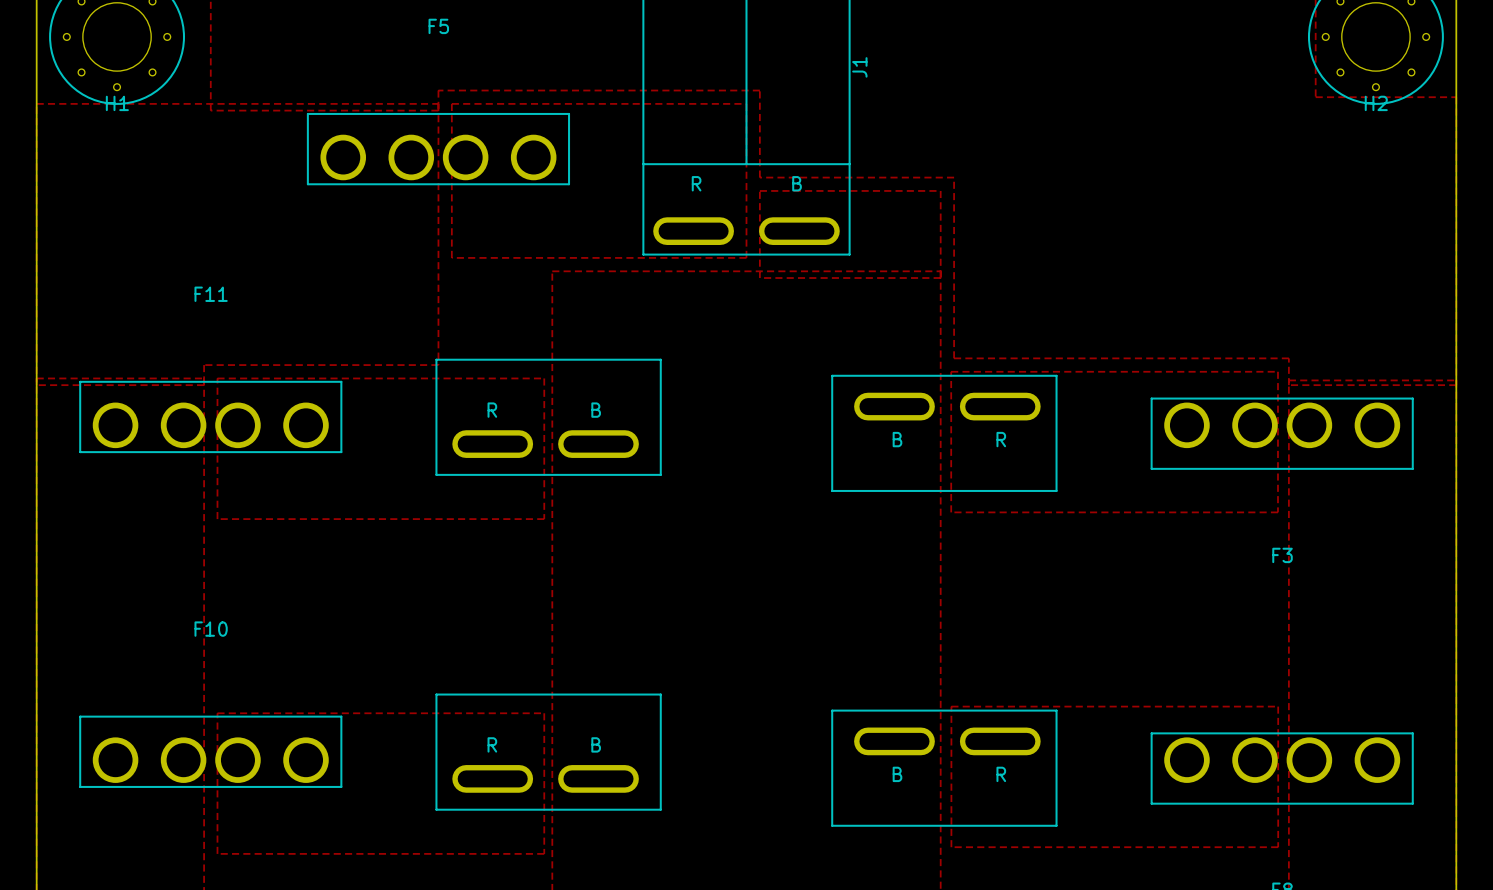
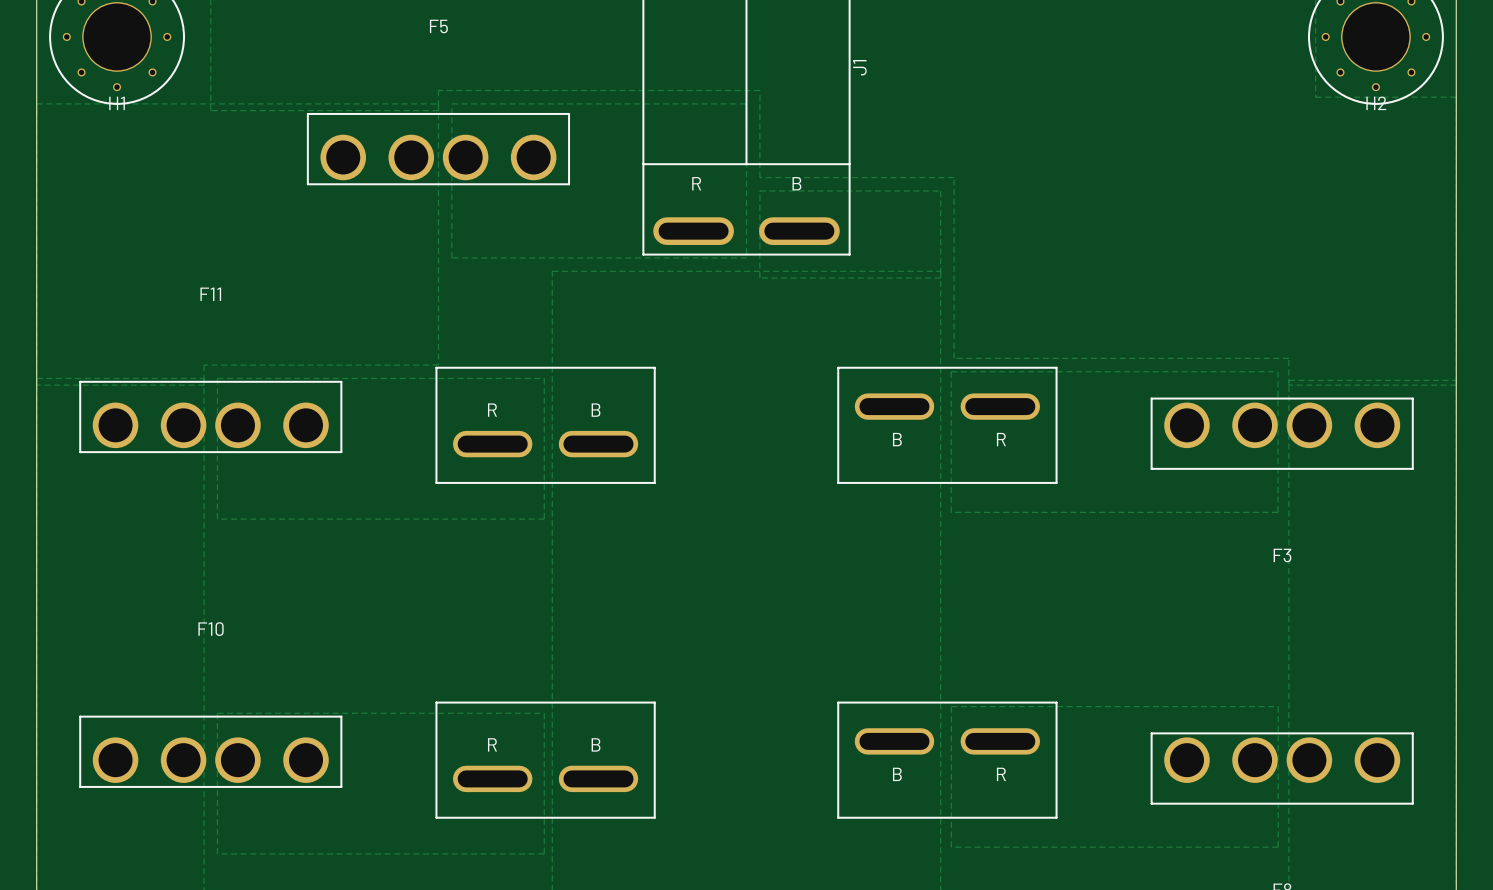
part footprint: [435, 358, 662, 476] -> [435, 366, 656, 484]
part footprint: [831, 374, 1058, 492] -> [837, 366, 1058, 484]
part footprint: [435, 693, 662, 811] -> [435, 701, 656, 819]
part footprint: [831, 709, 1058, 827] -> [837, 701, 1058, 819]

